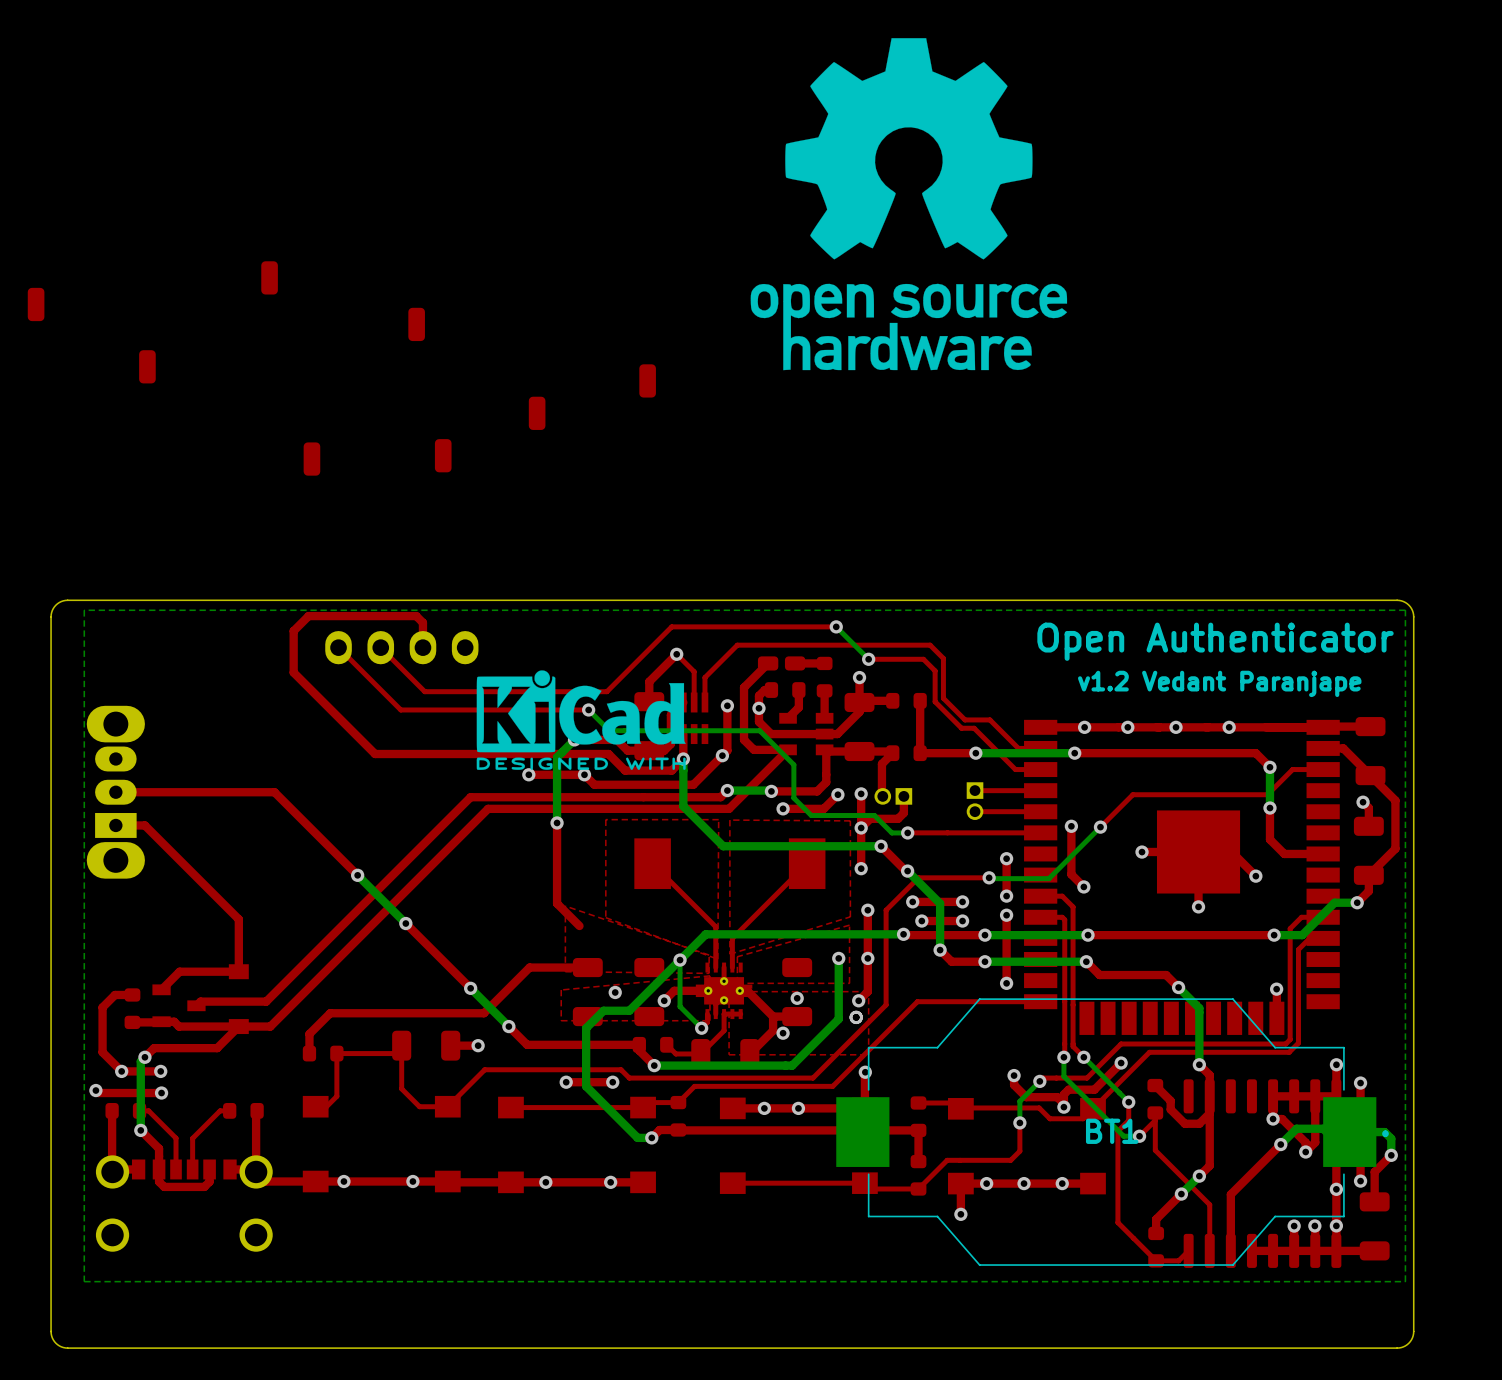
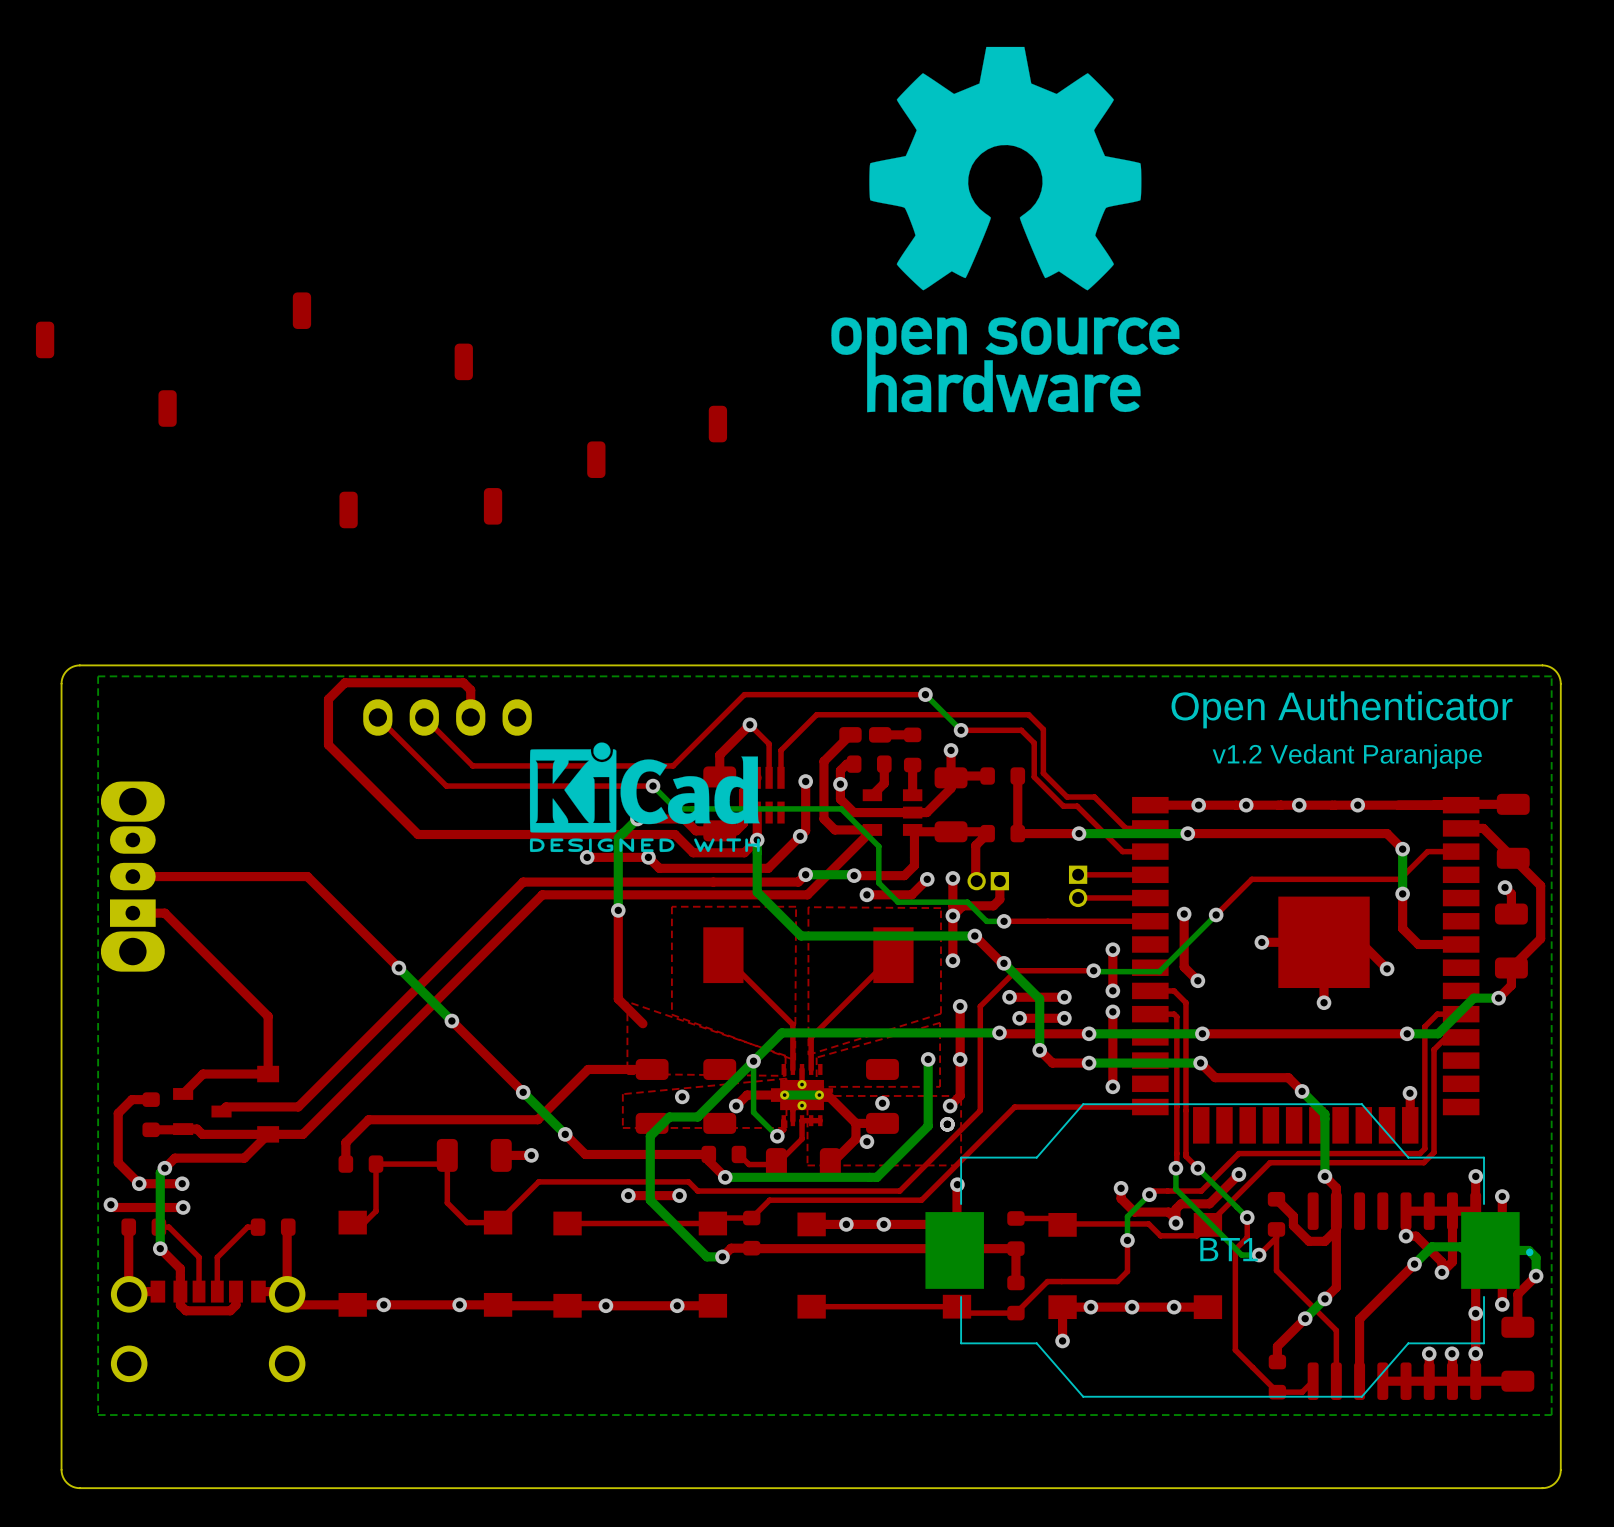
bottom track: none -> (819, 1095) (784, 1095)

